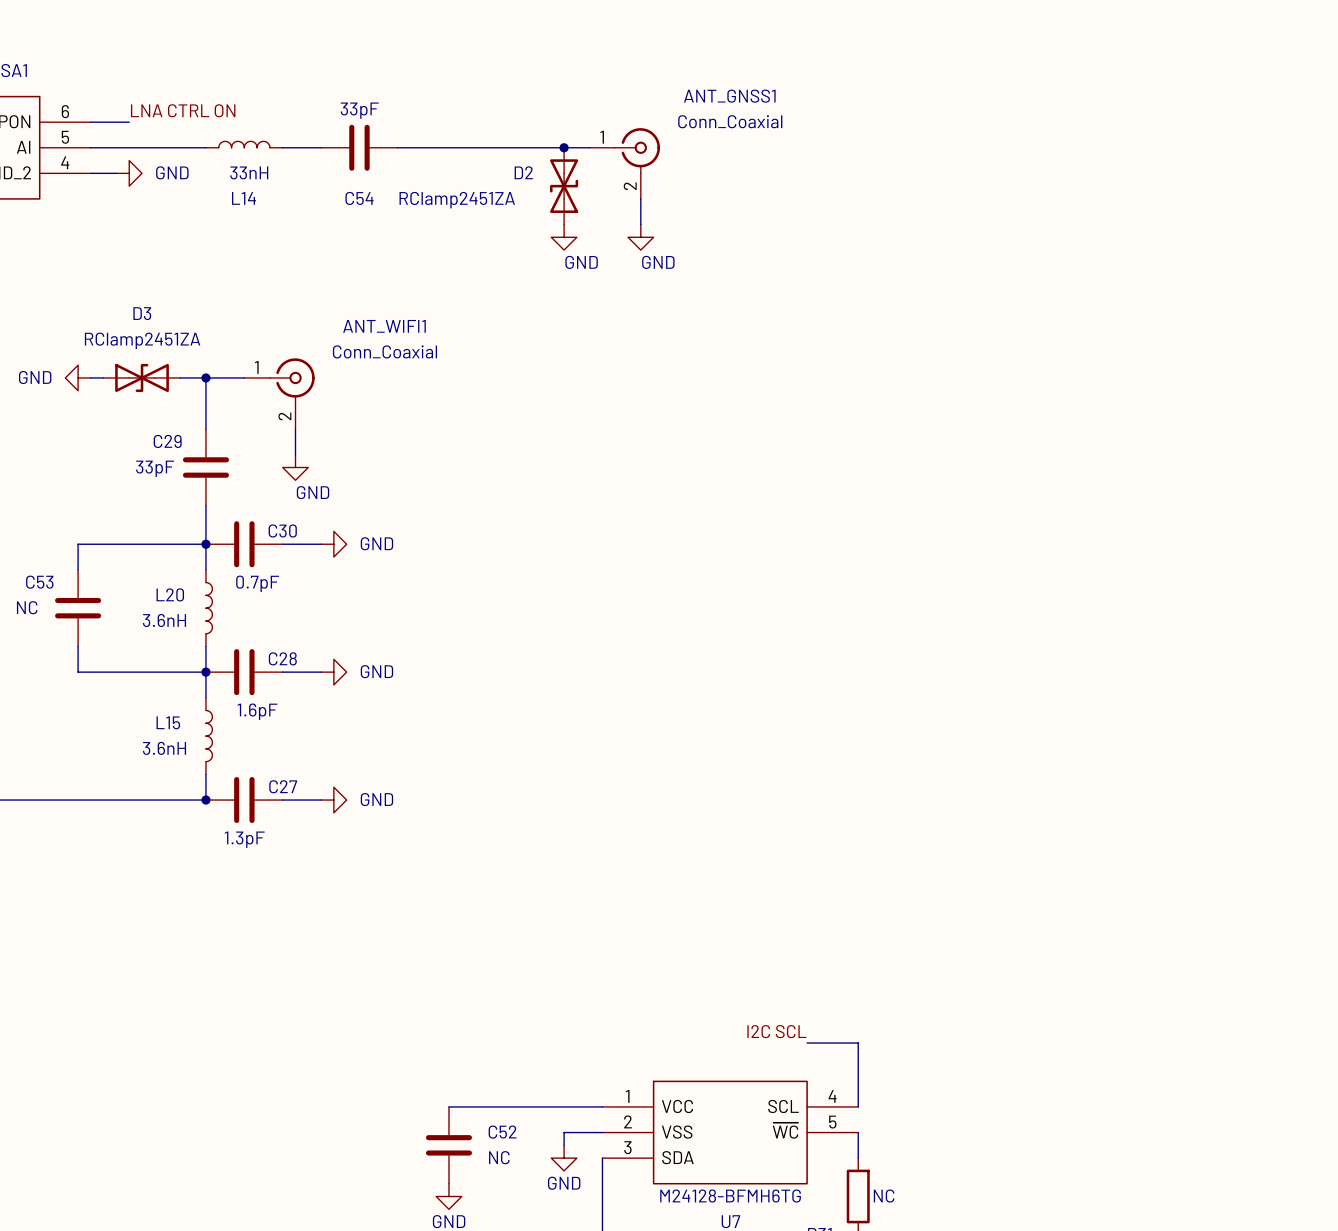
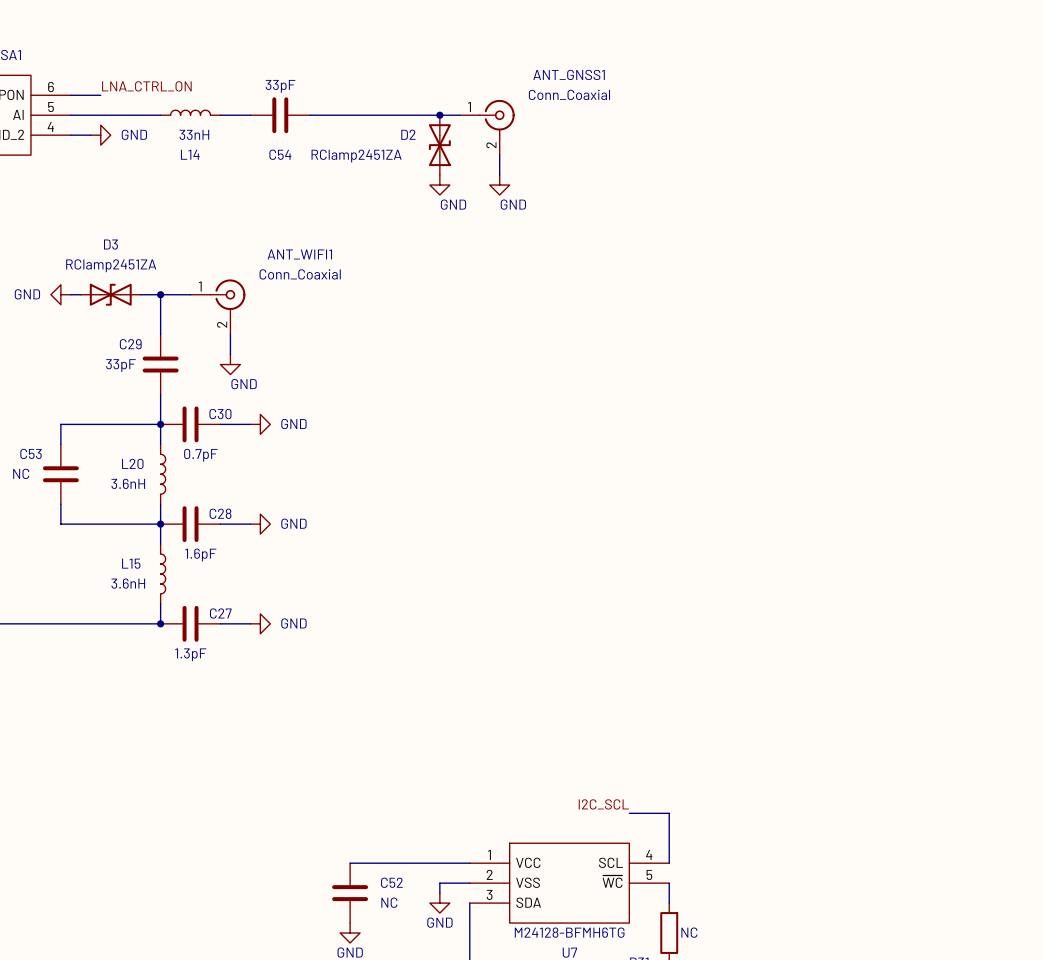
label: LNA CTRL ON (183, 110) -> LNA_CTRL_ON (146, 86)
label: I2C SCL (776, 1031) -> I2C_SCL (603, 804)

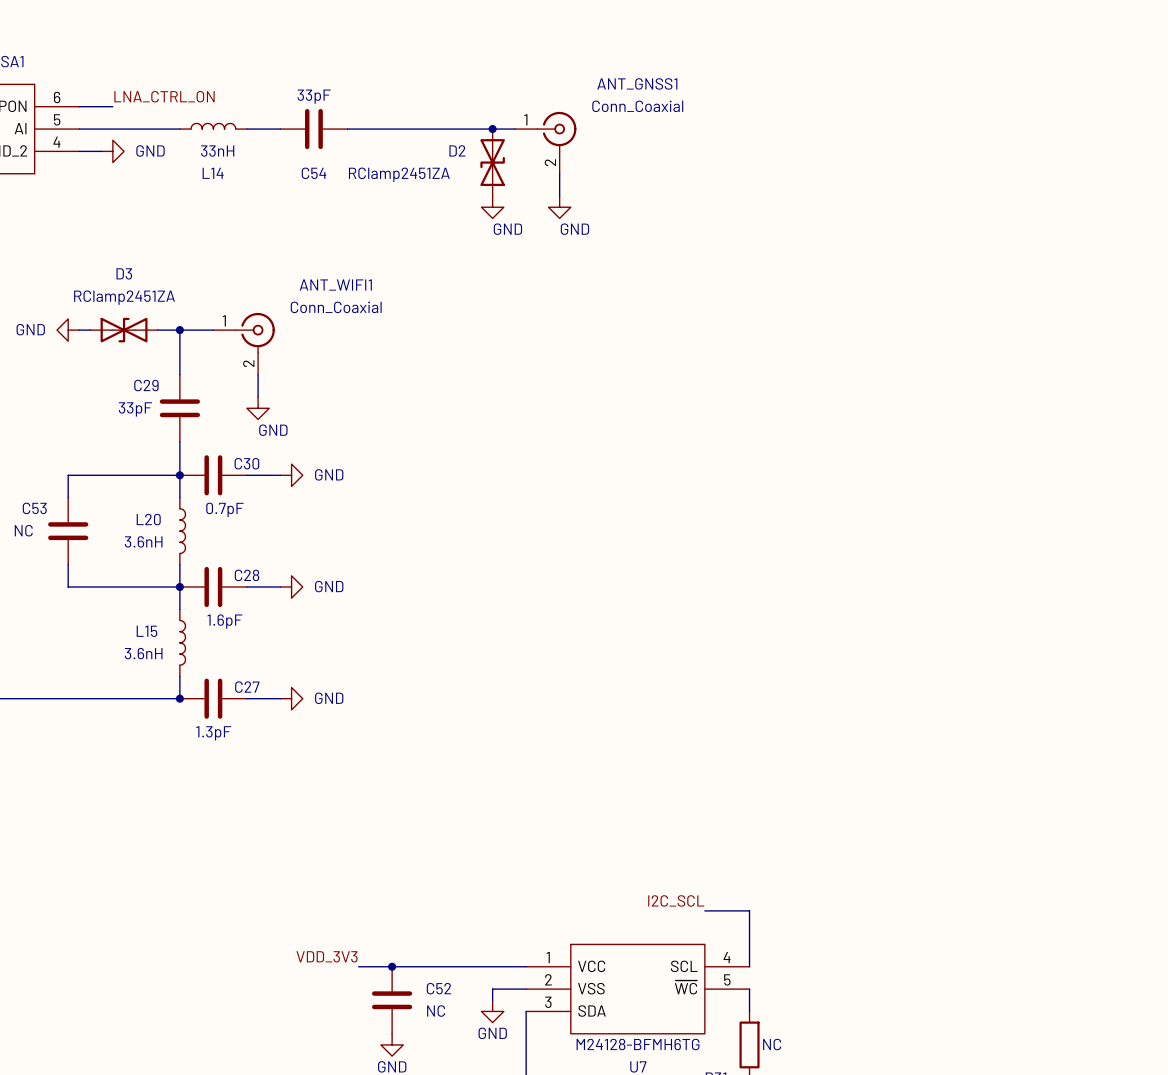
label: none -> VDD_3V3 (327, 956)
wire: none -> (358, 966) (392, 966)
junction: none -> (392, 966)

